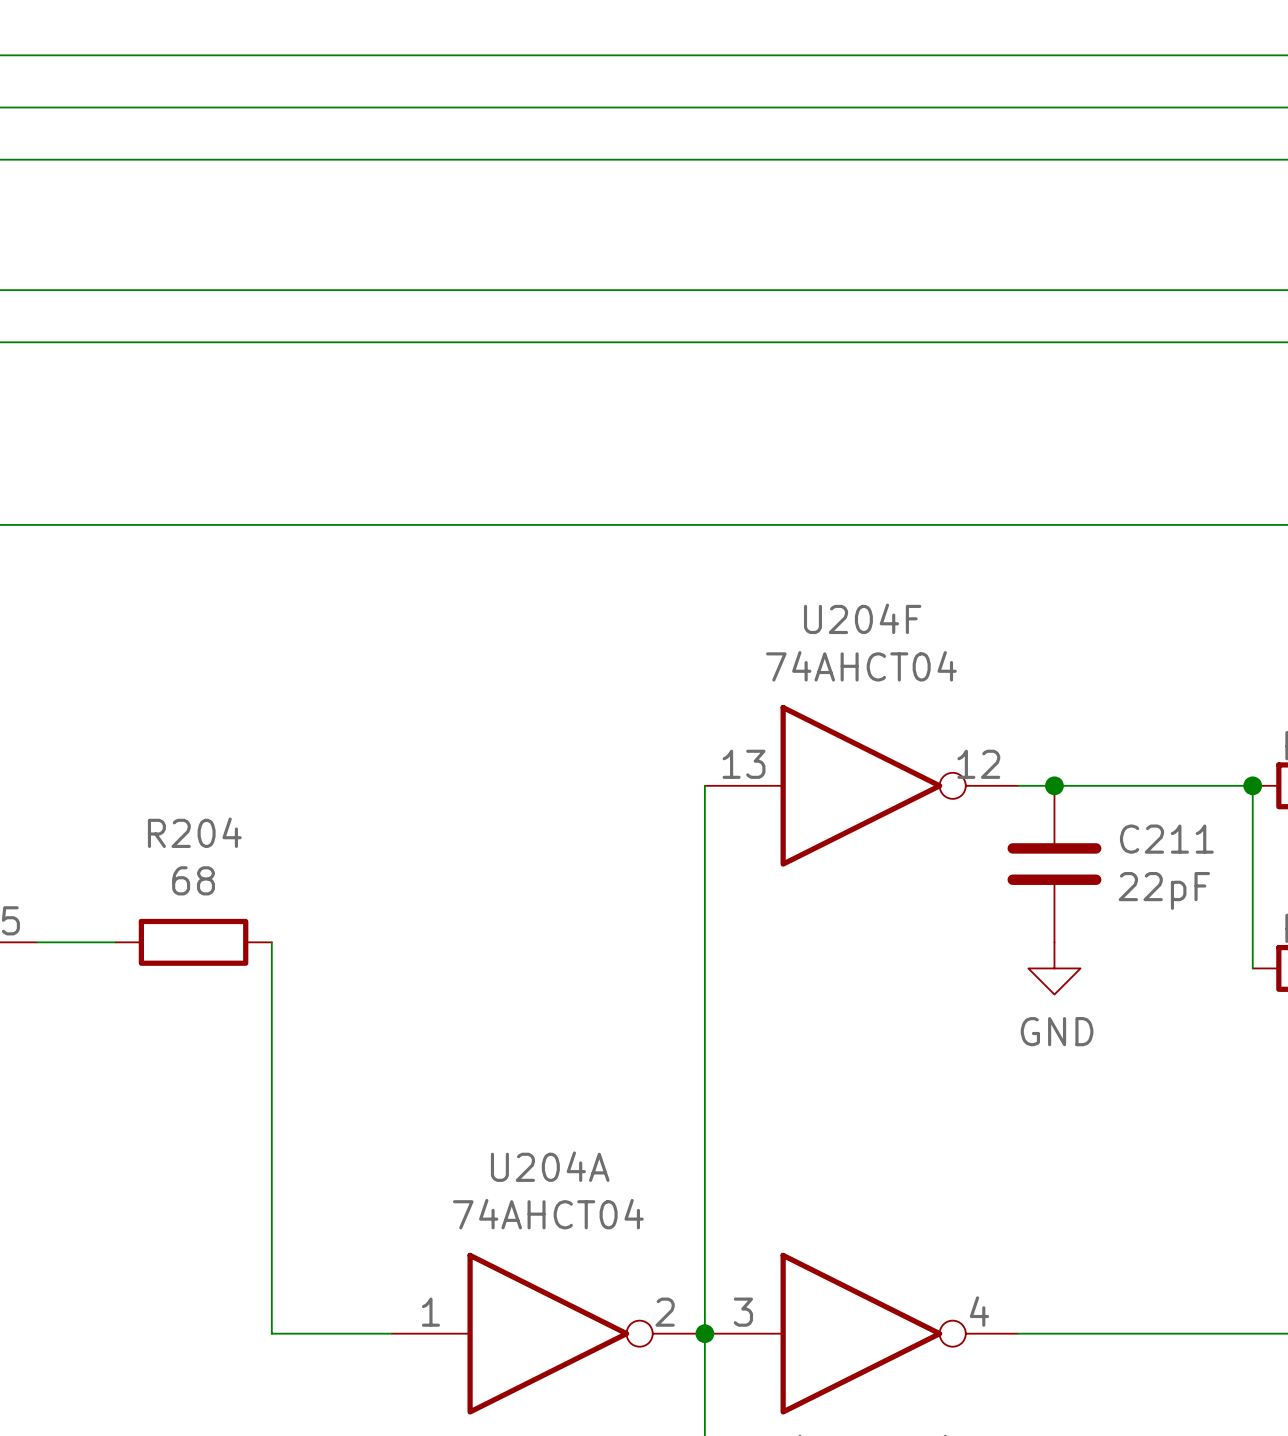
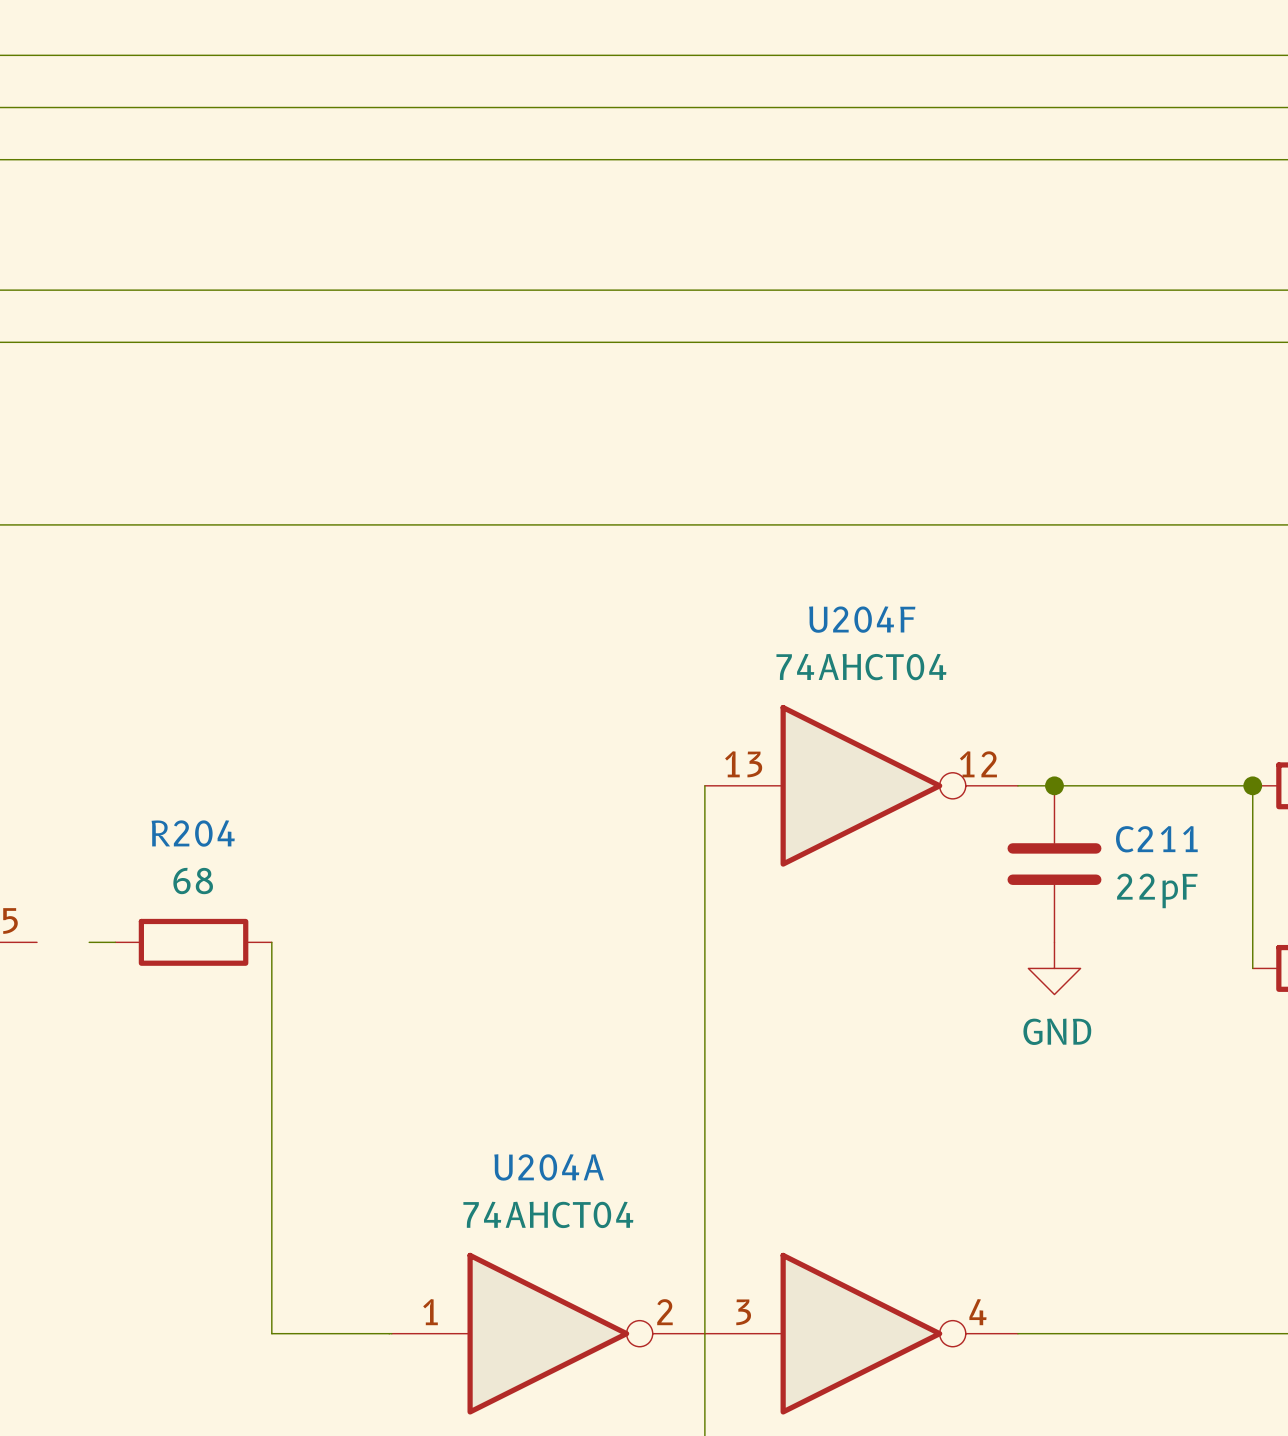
wire: (37, 942) (89, 942) -> none
junction: (704, 1333) -> none

